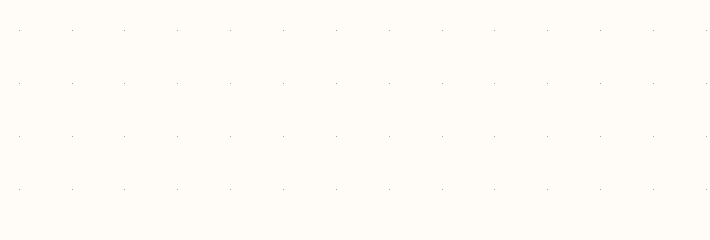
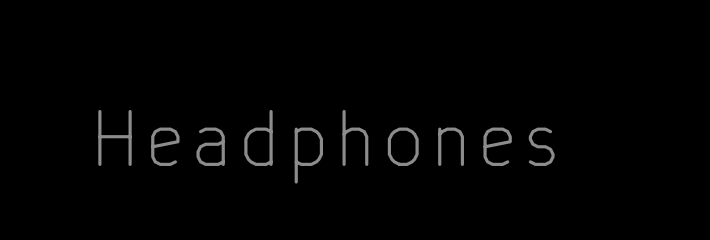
text: none -> Headphones (326, 146)

